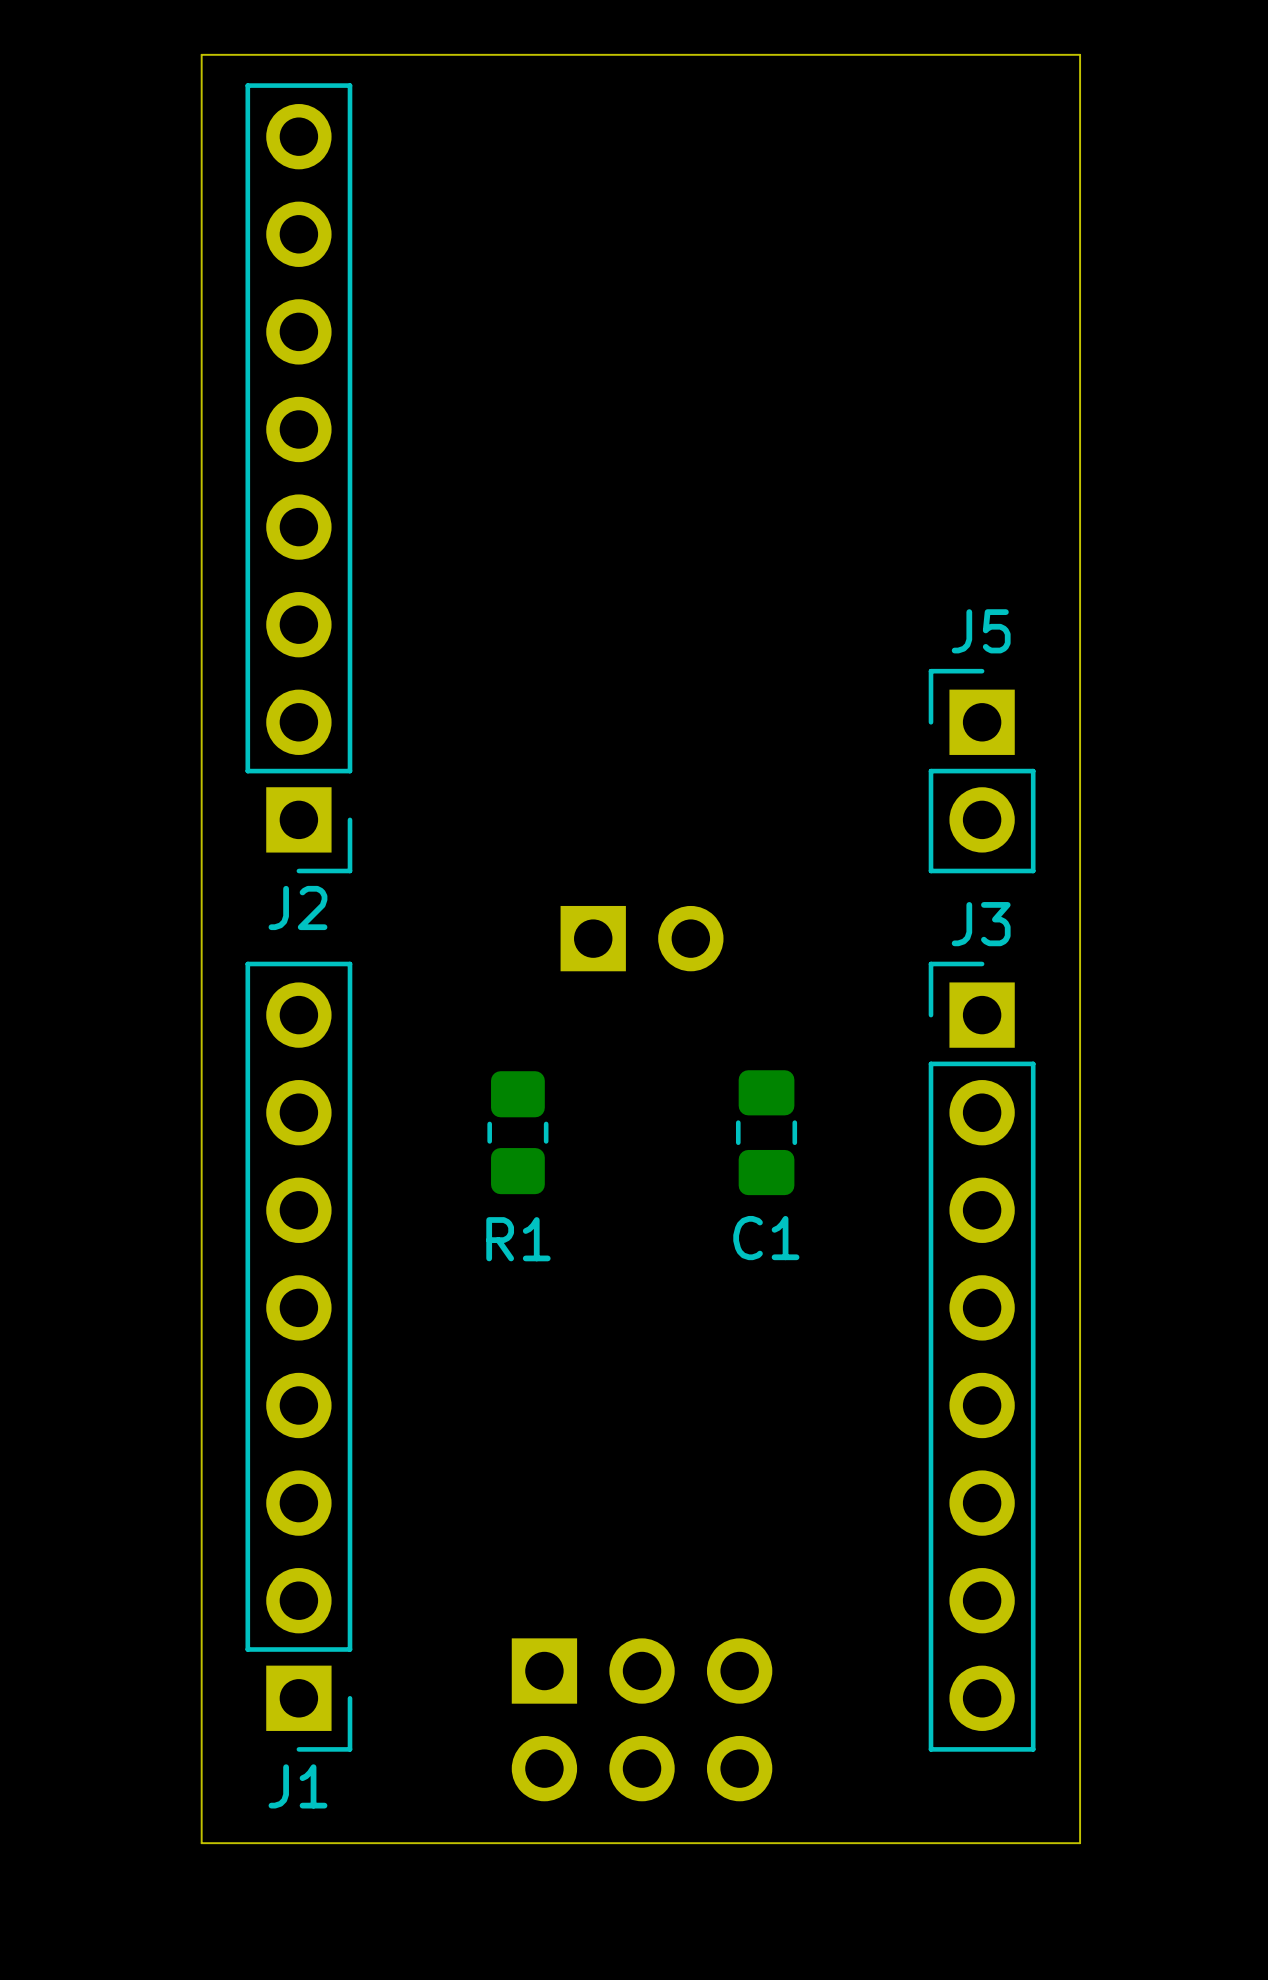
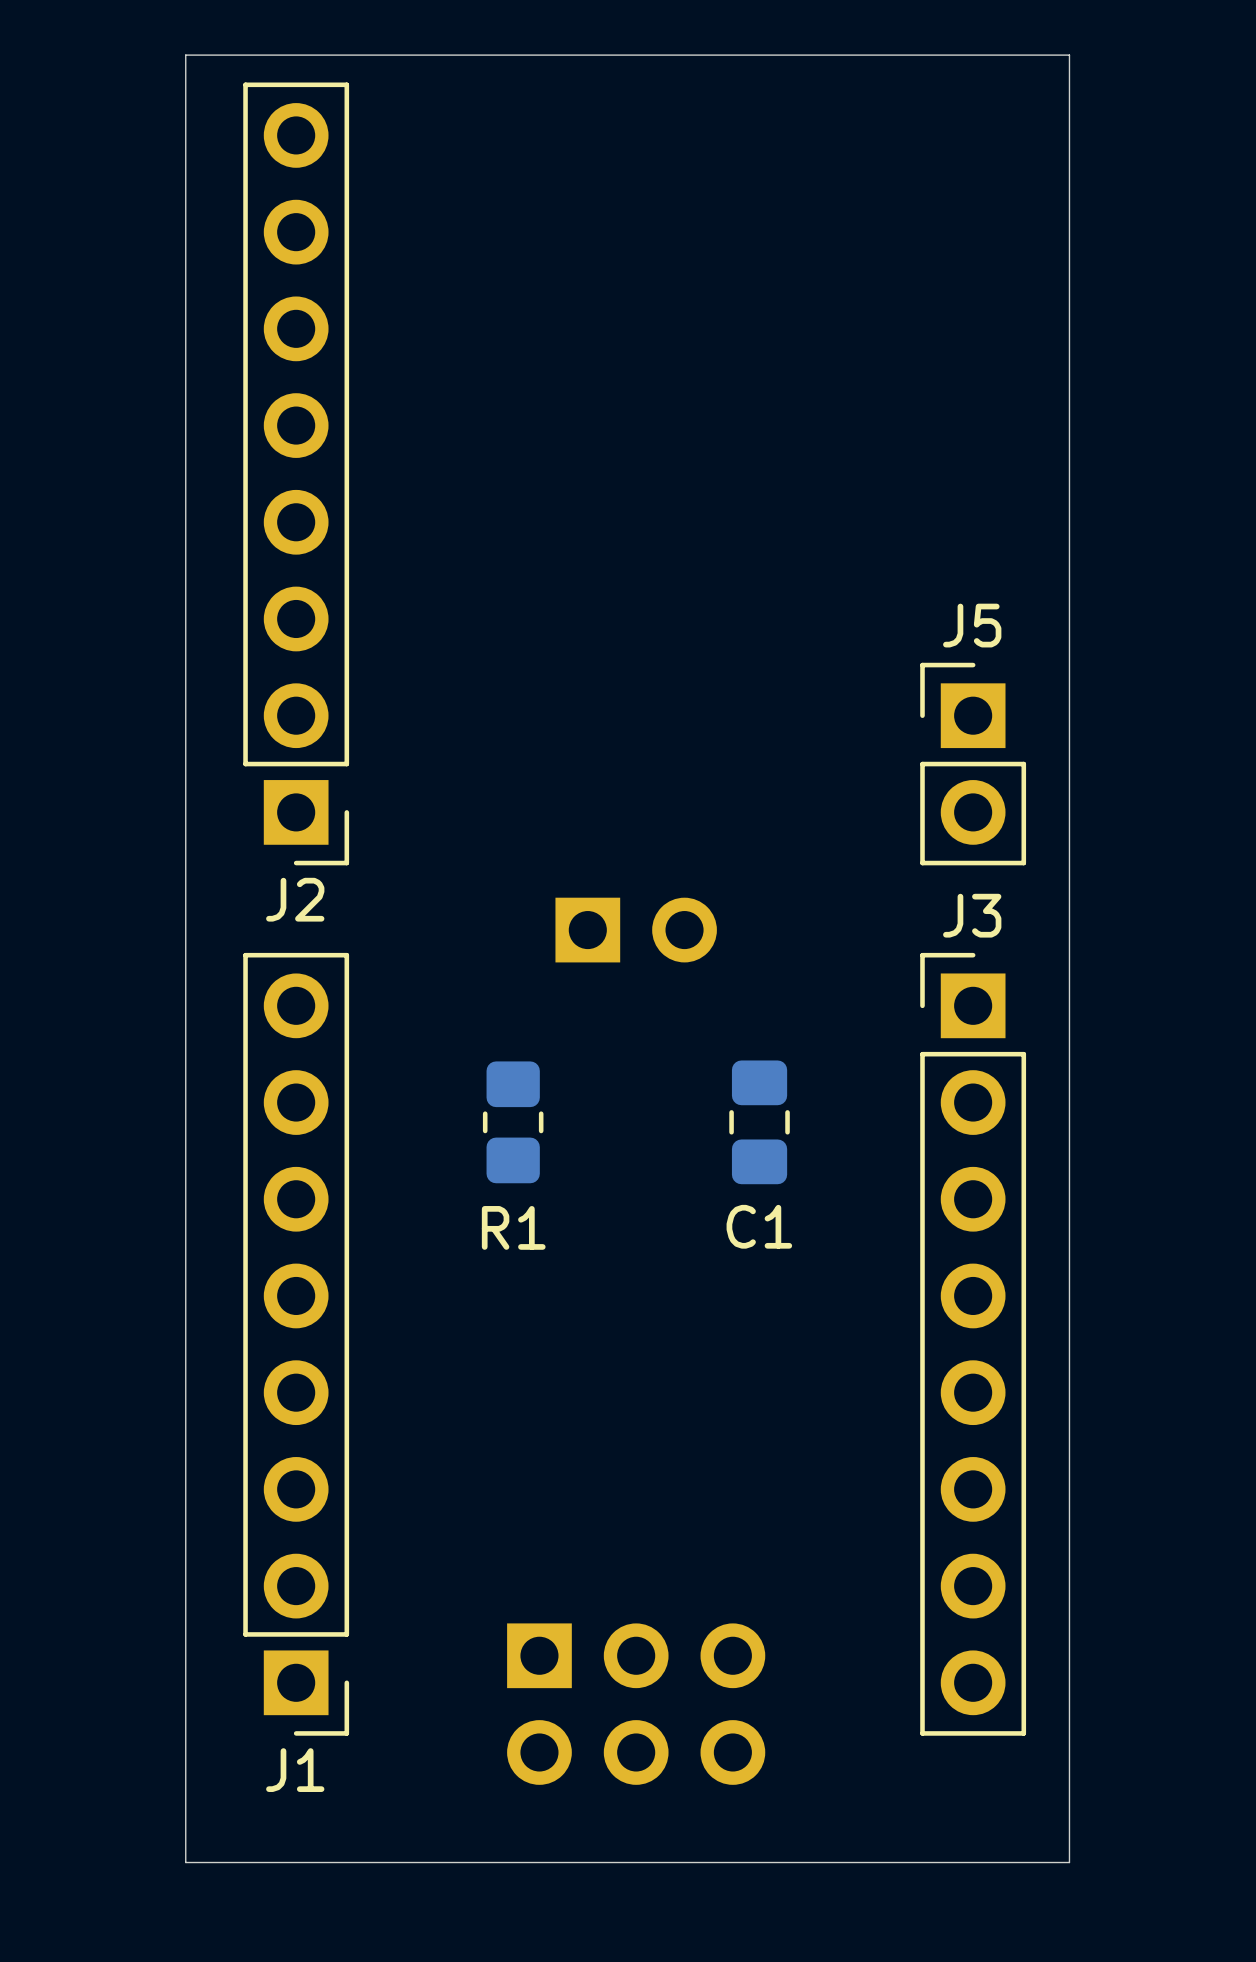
board edge: (1080, 54) (201, 54) (201, 1843) (1080, 1843) (1080, 54) -> (1069, 55) (1069, 1862) (185, 1862) (185, 55) (1069, 55)

